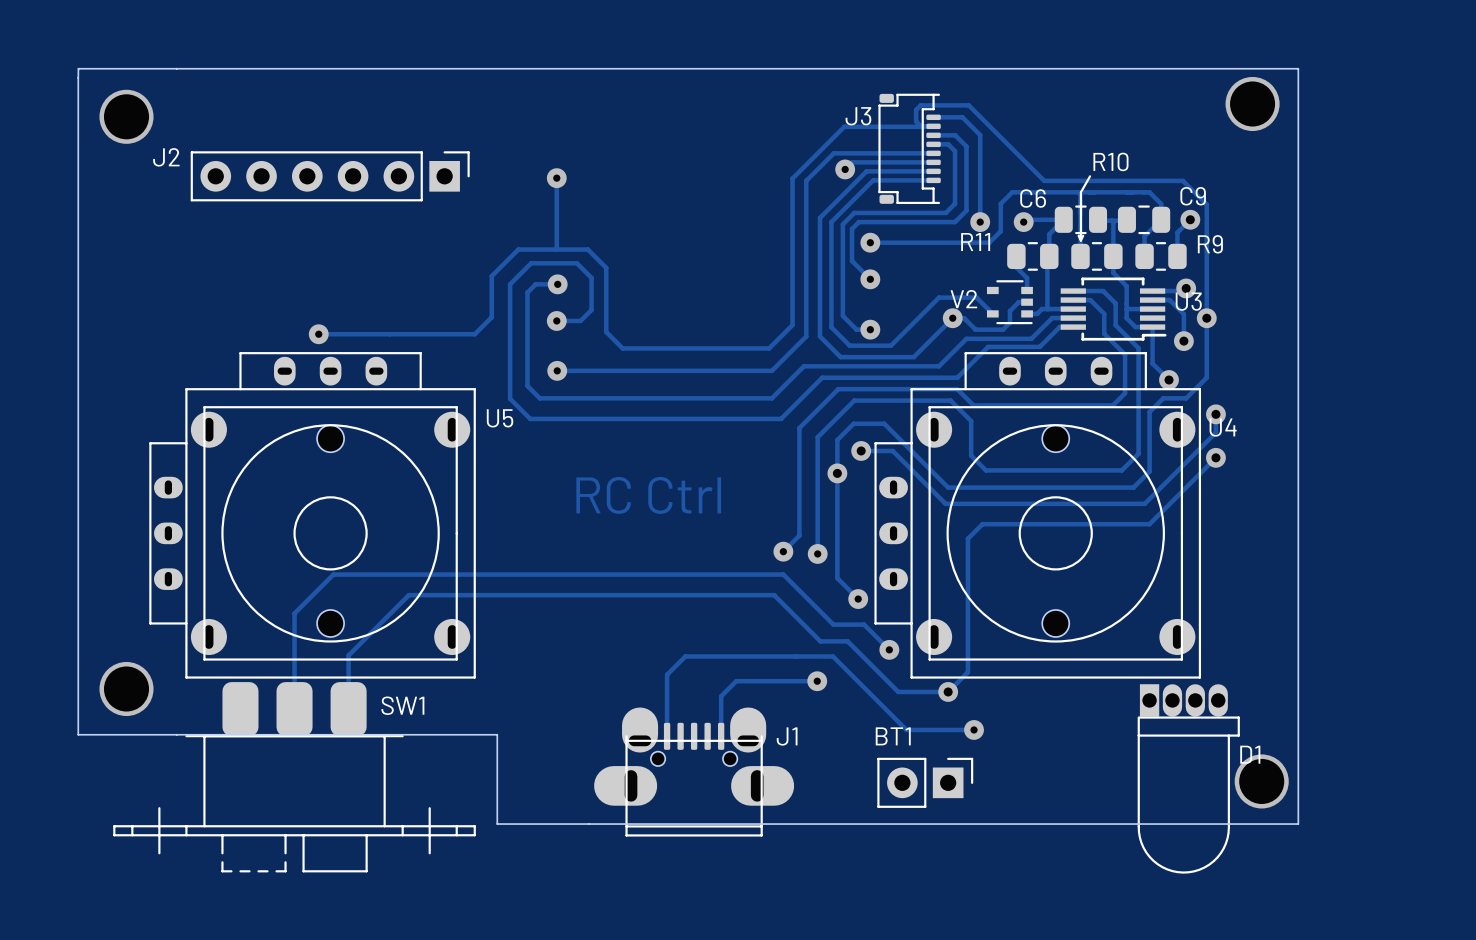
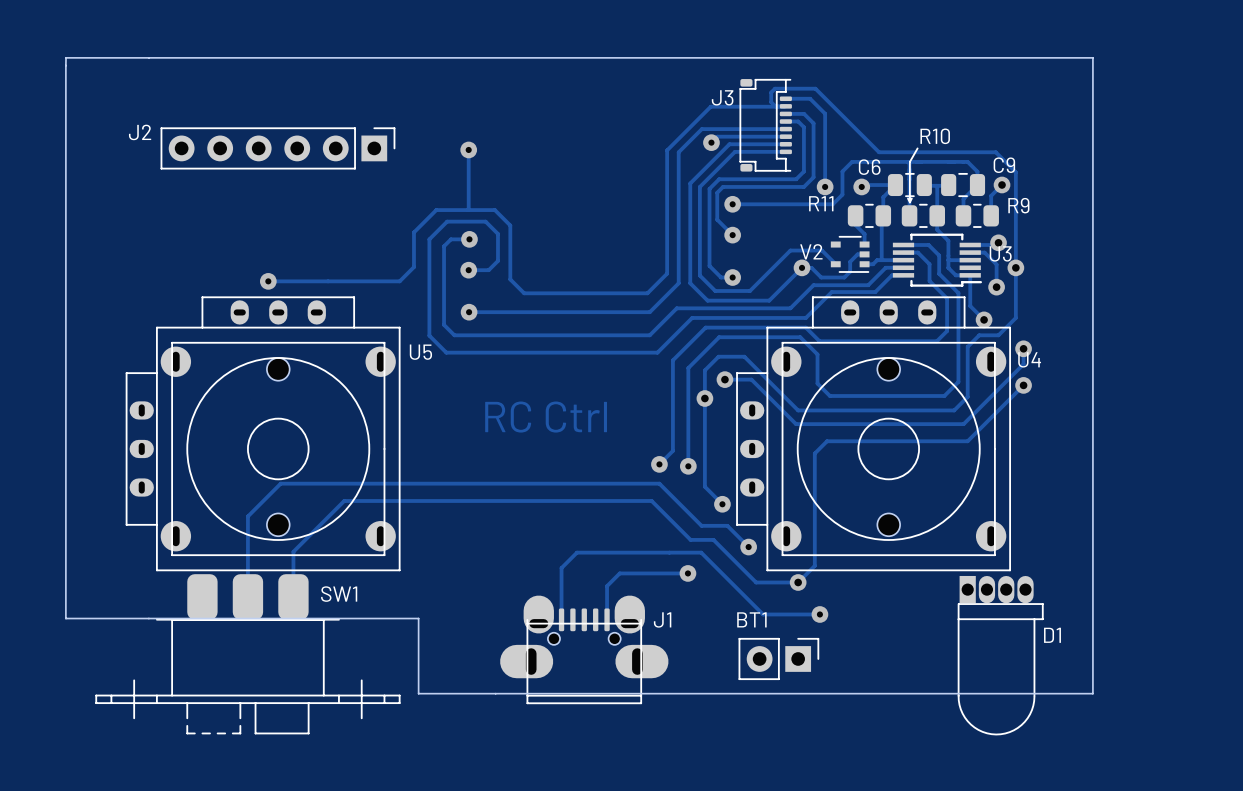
via: (1252, 103) -> none
via: (126, 116) -> none
via: (126, 688) -> none
via: (1261, 781) -> none

